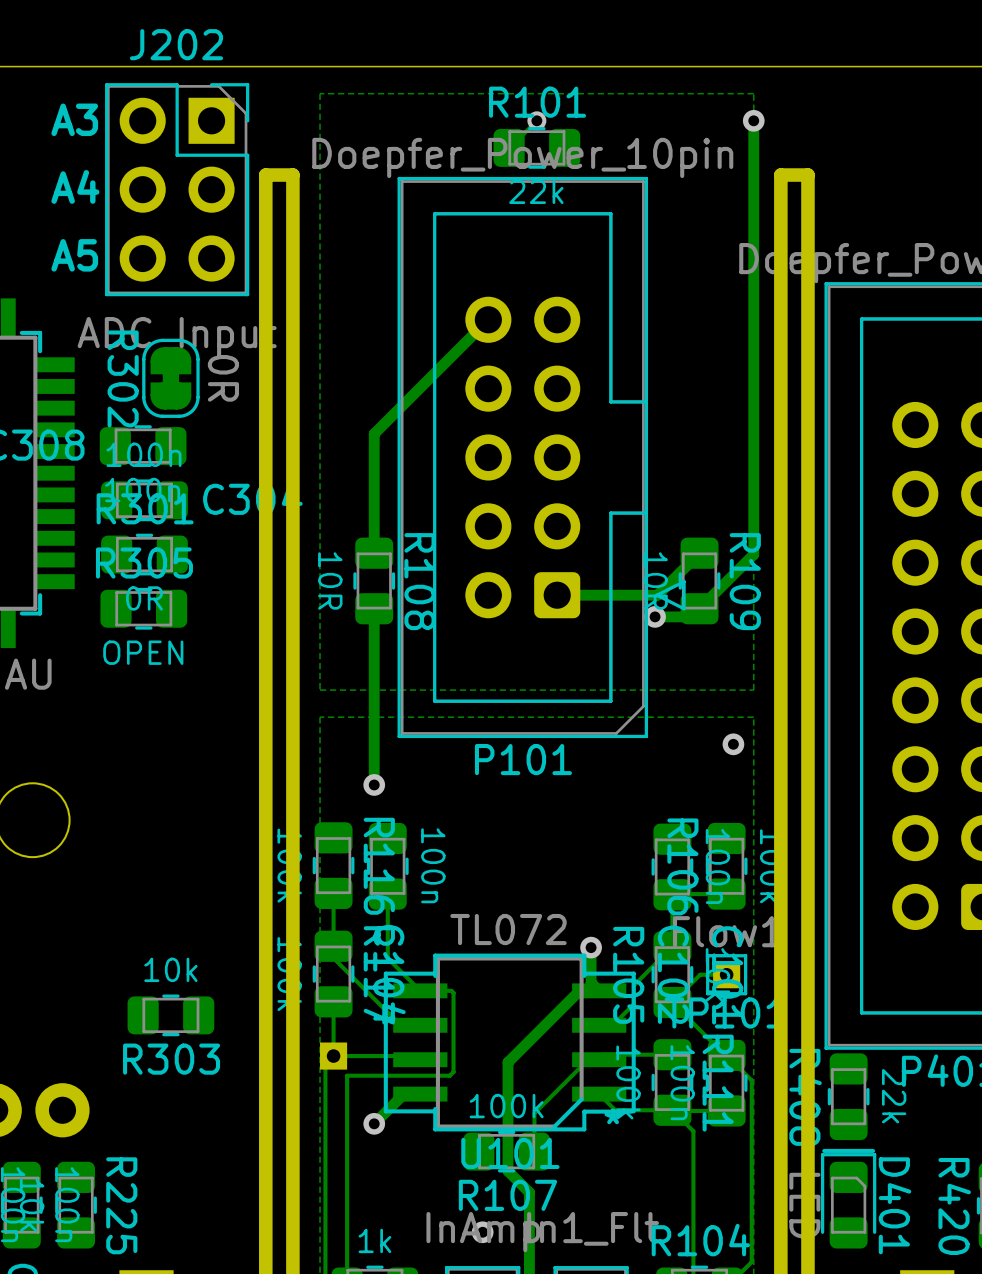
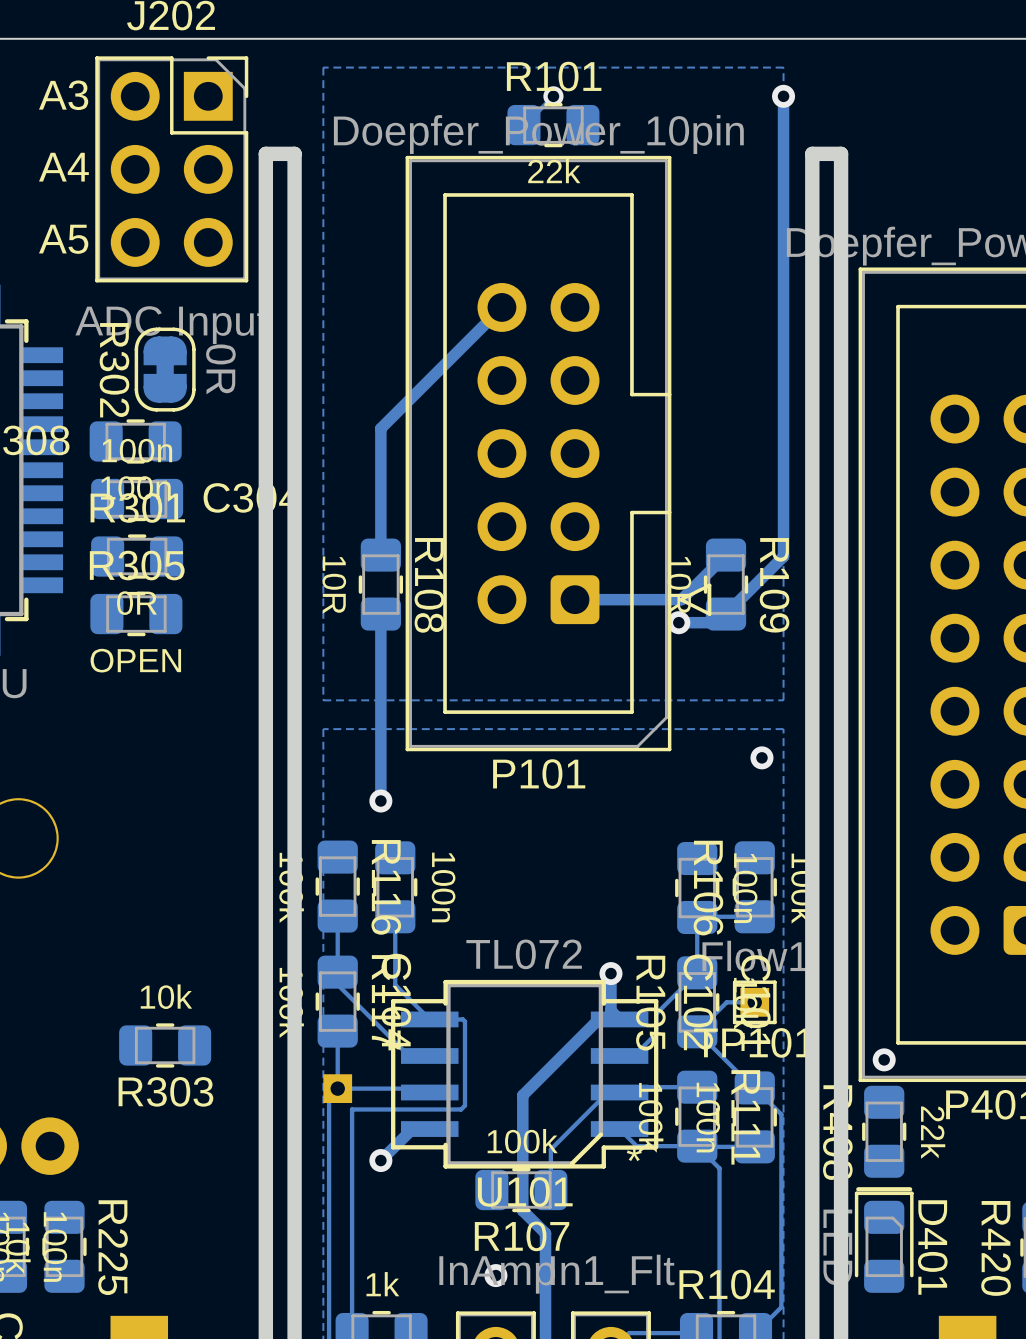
via: none -> (884, 1059)

